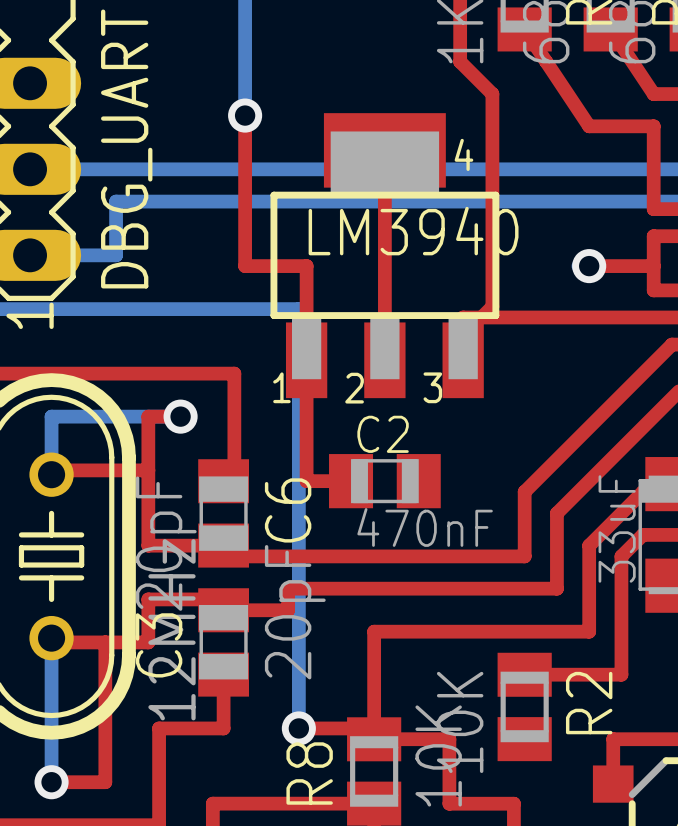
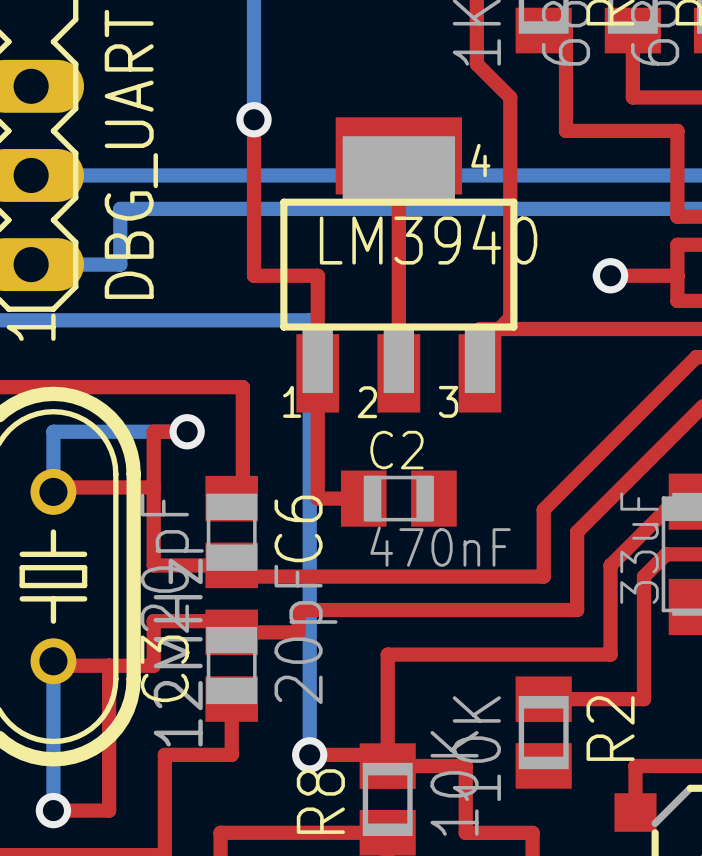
top track: (524, 29) (589, 126) -> (543, 30) (565, 30) (565, 130) (610, 130)
top track: (610, 29) (653, 94) -> (632, 30) (632, 97) (677, 97)

